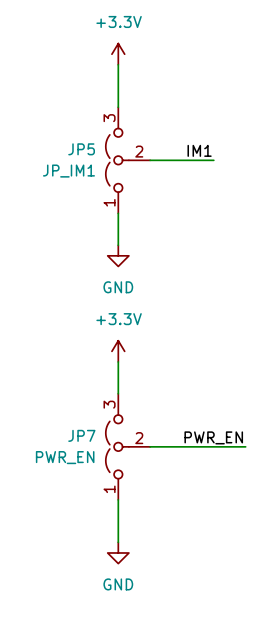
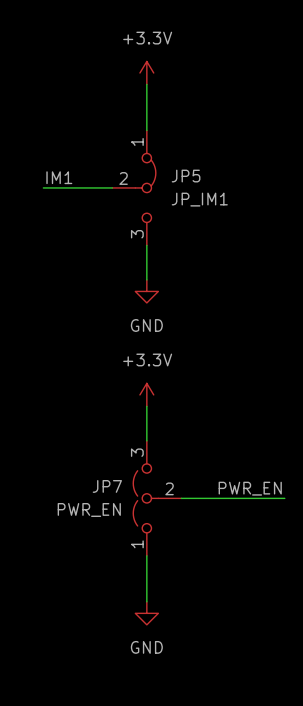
JP5 symbol: [105, 107, 151, 214] -> [112, 130, 156, 246]
JP5 name position: JP5 (81, 149) -> JP5 (186, 176)
label position: IM1 (199, 150) -> IM1 (59, 177)
wire: (150, 160) (213, 160) -> (43, 187) (112, 187)
JP5 value position: JP_IM1 (68, 171) -> JP_IM1 (199, 199)

